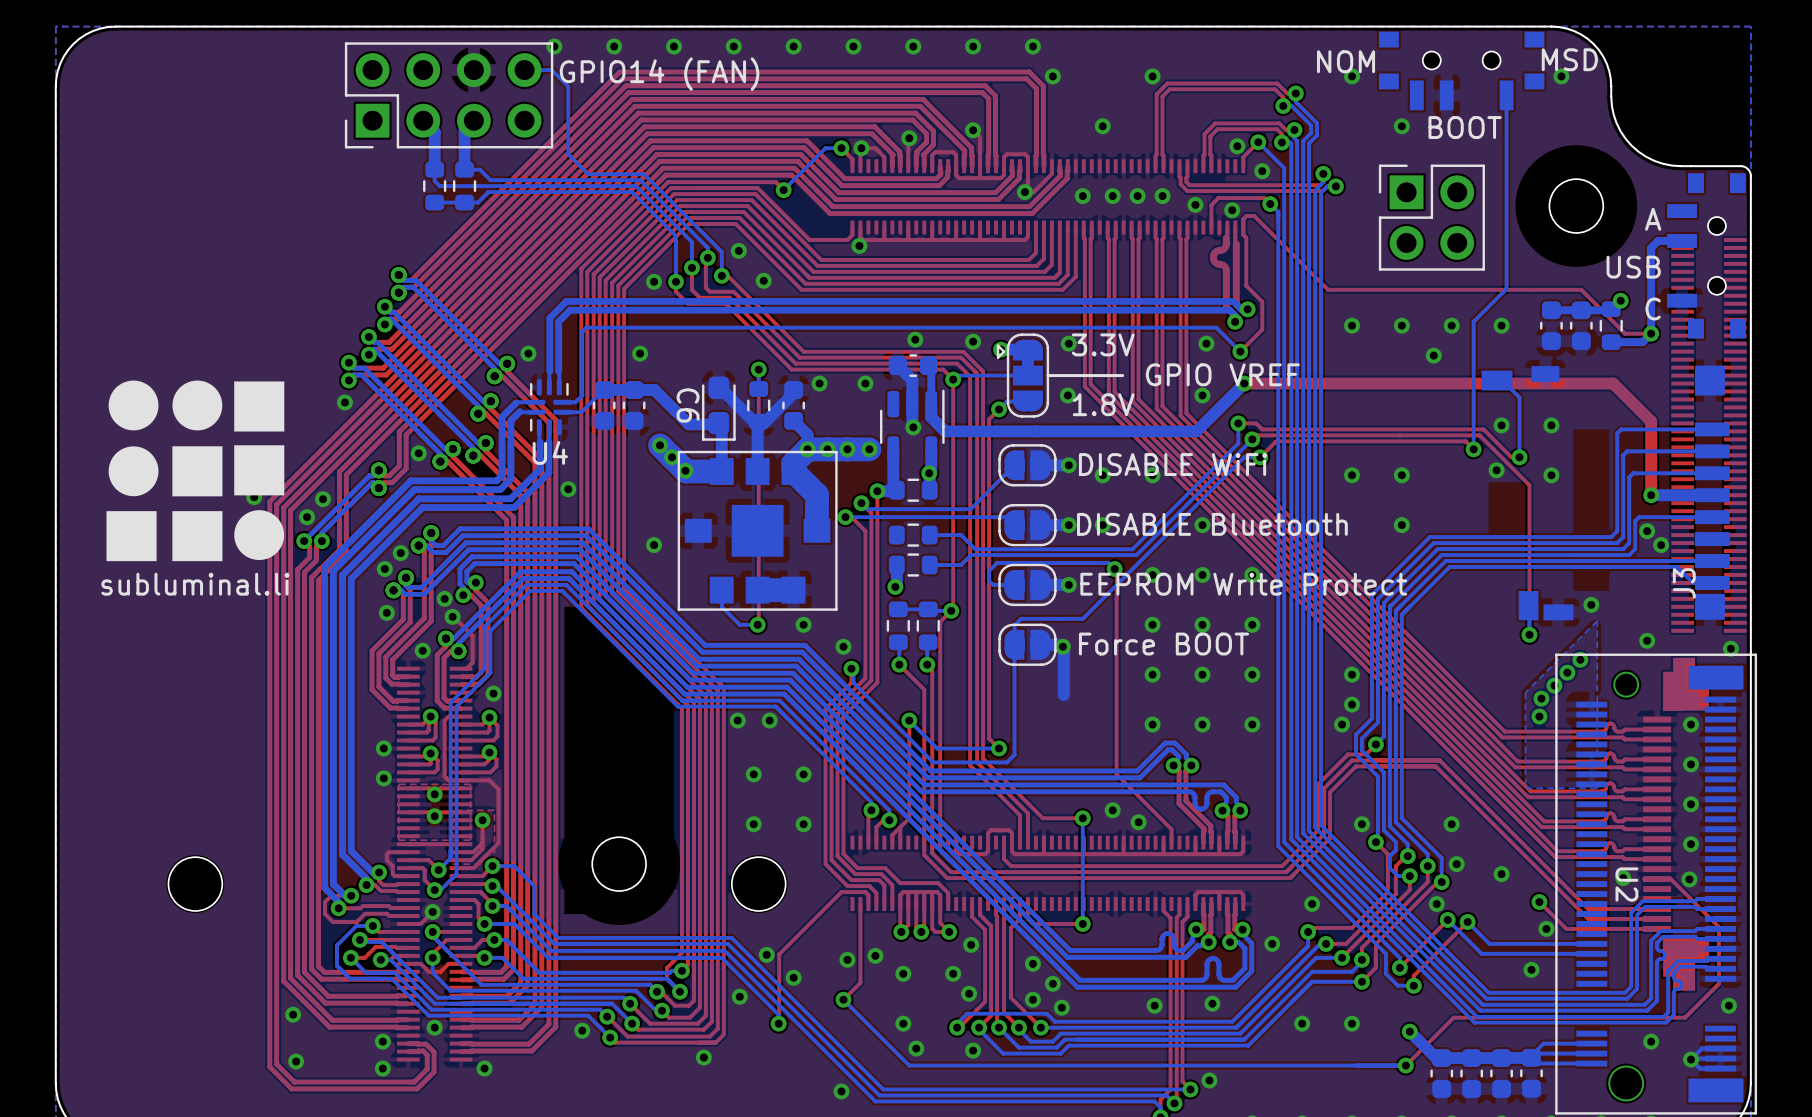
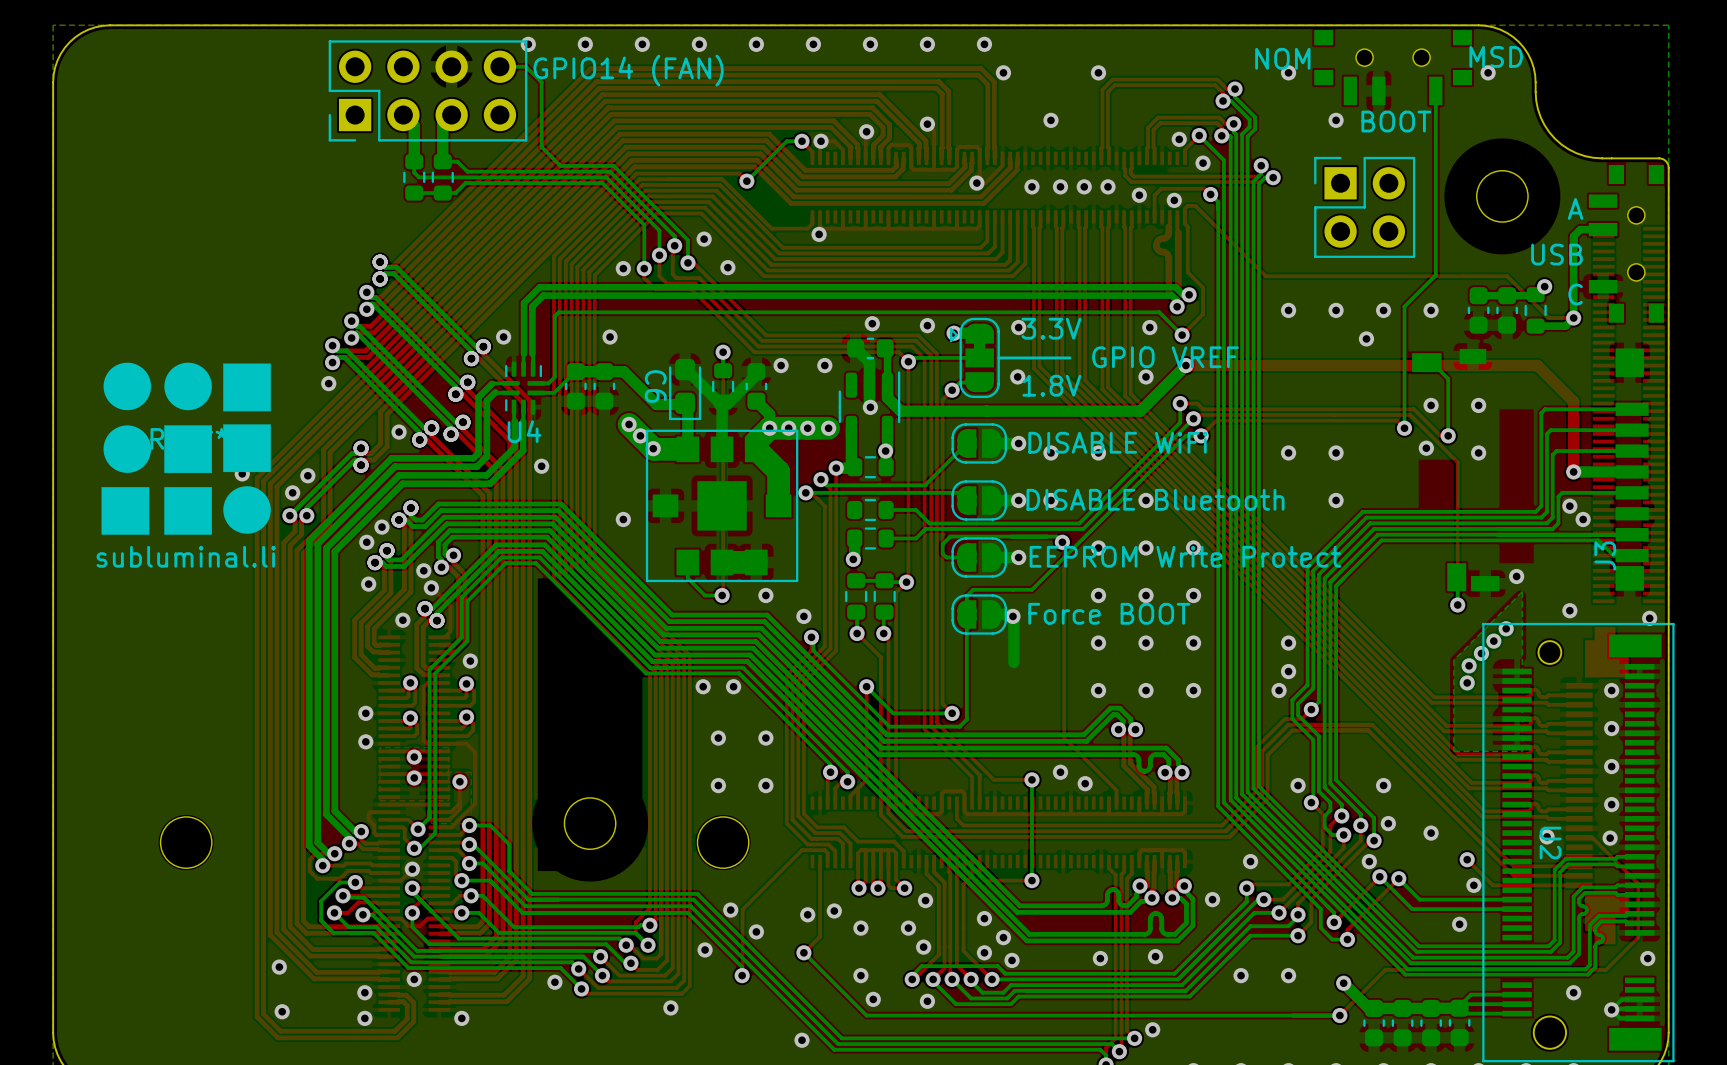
drawing: [106, 380, 285, 562] -> none
part: none -> (186, 448)

